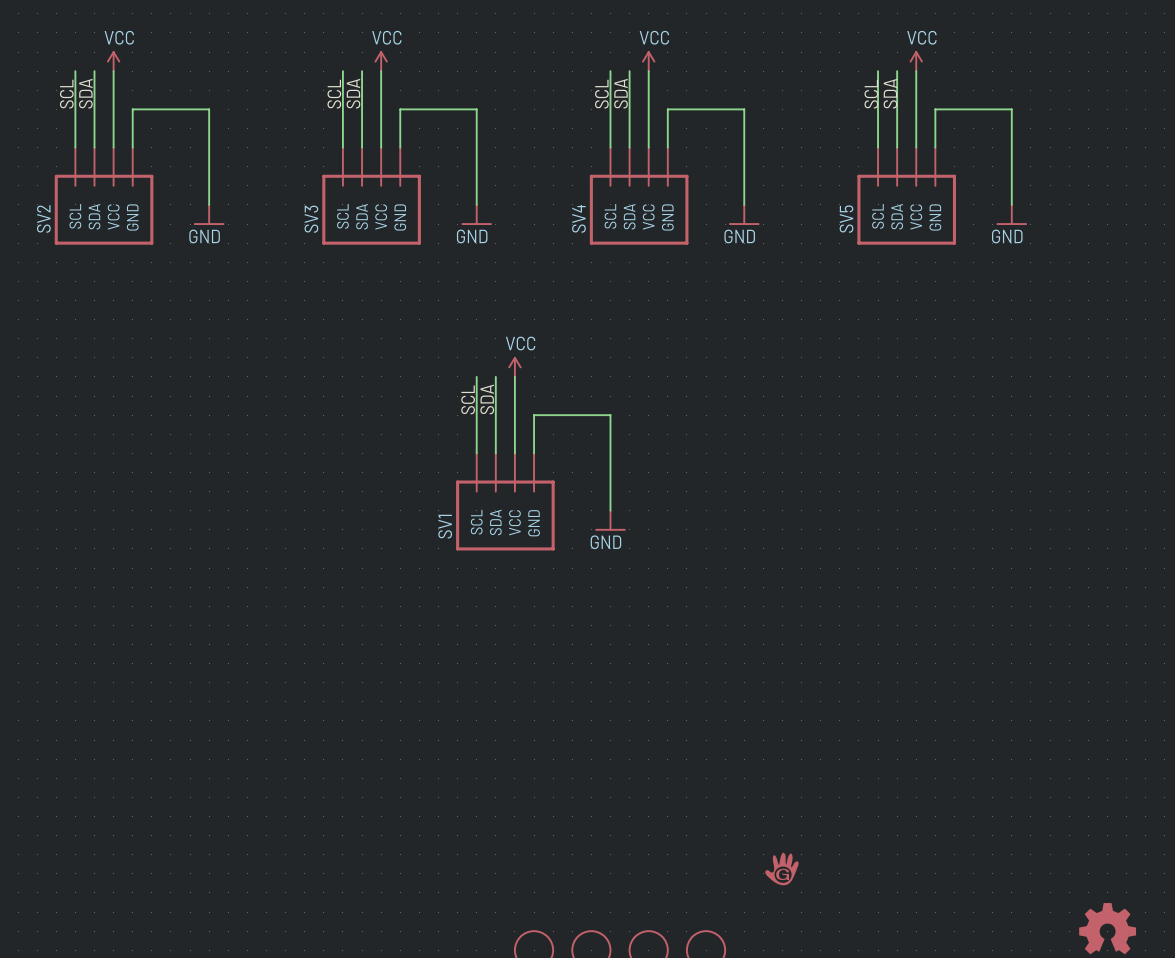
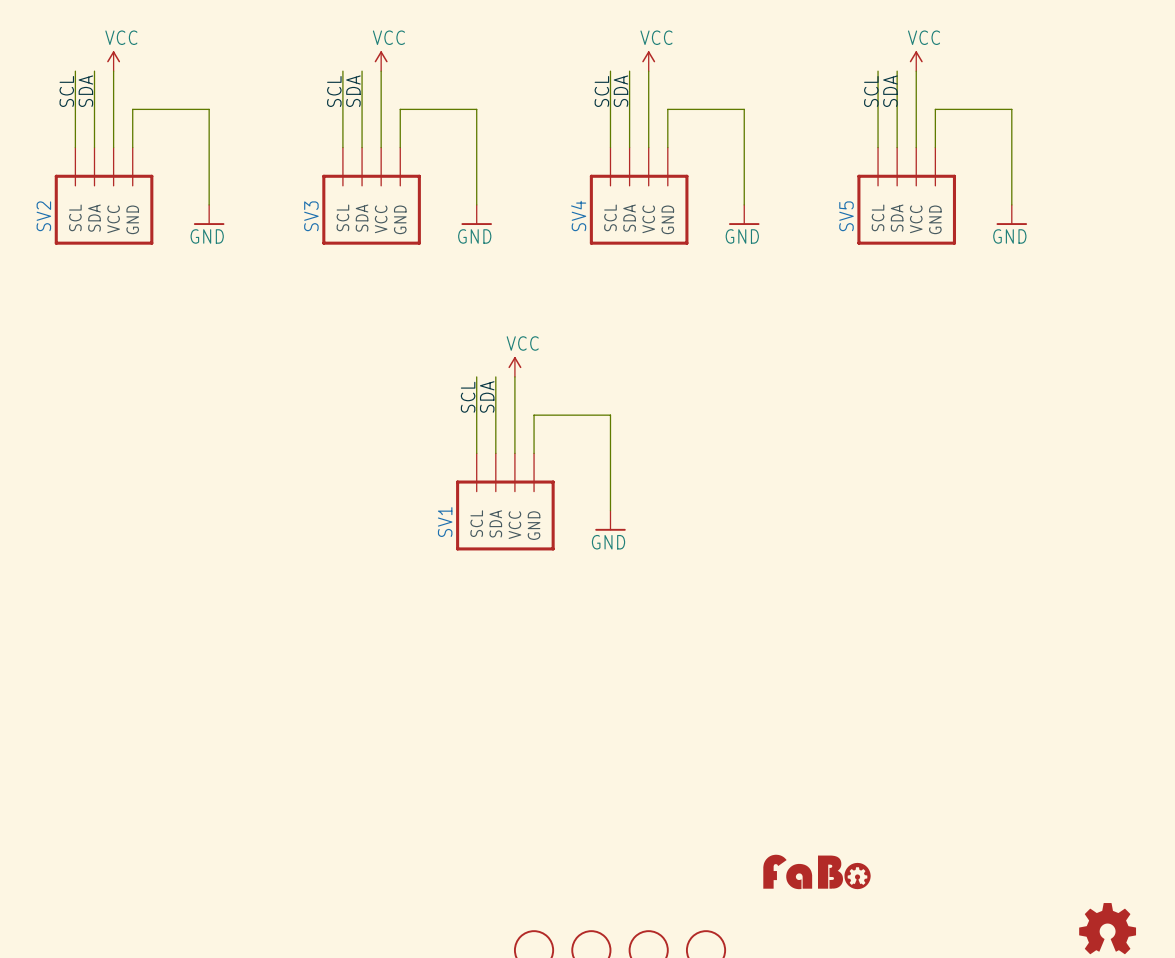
part: (781, 868) -> none
part: none -> (816, 871)

